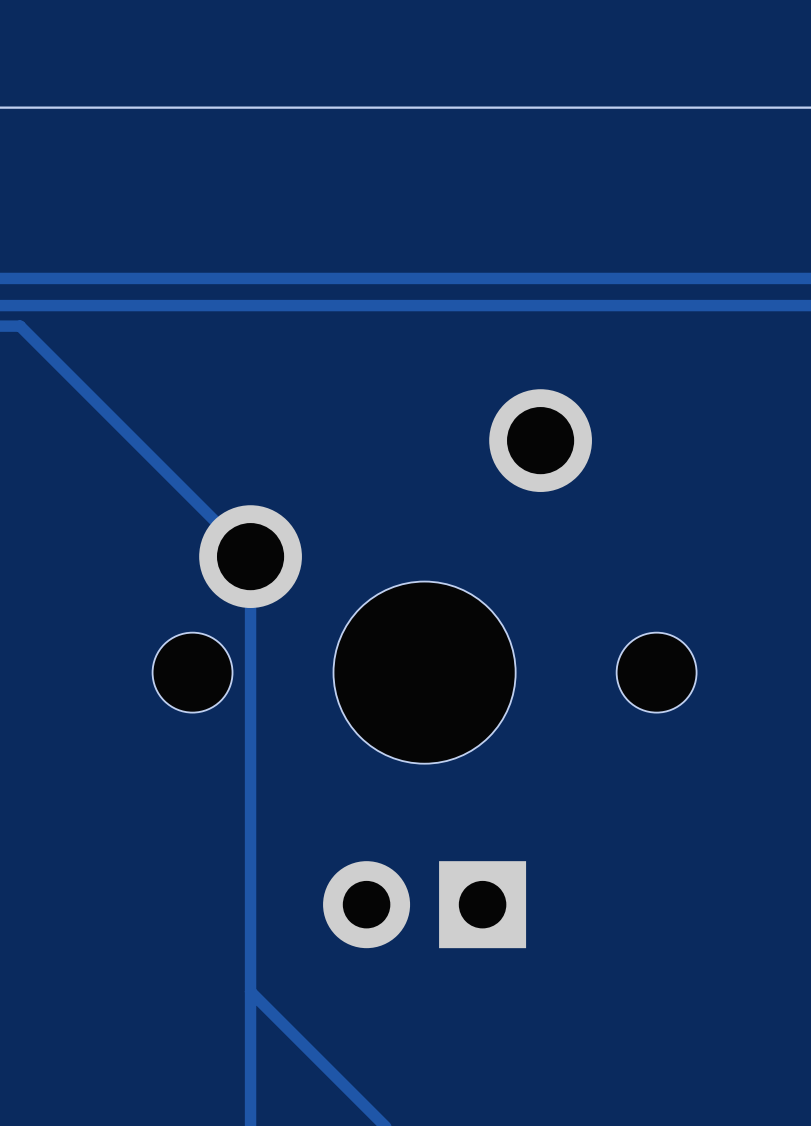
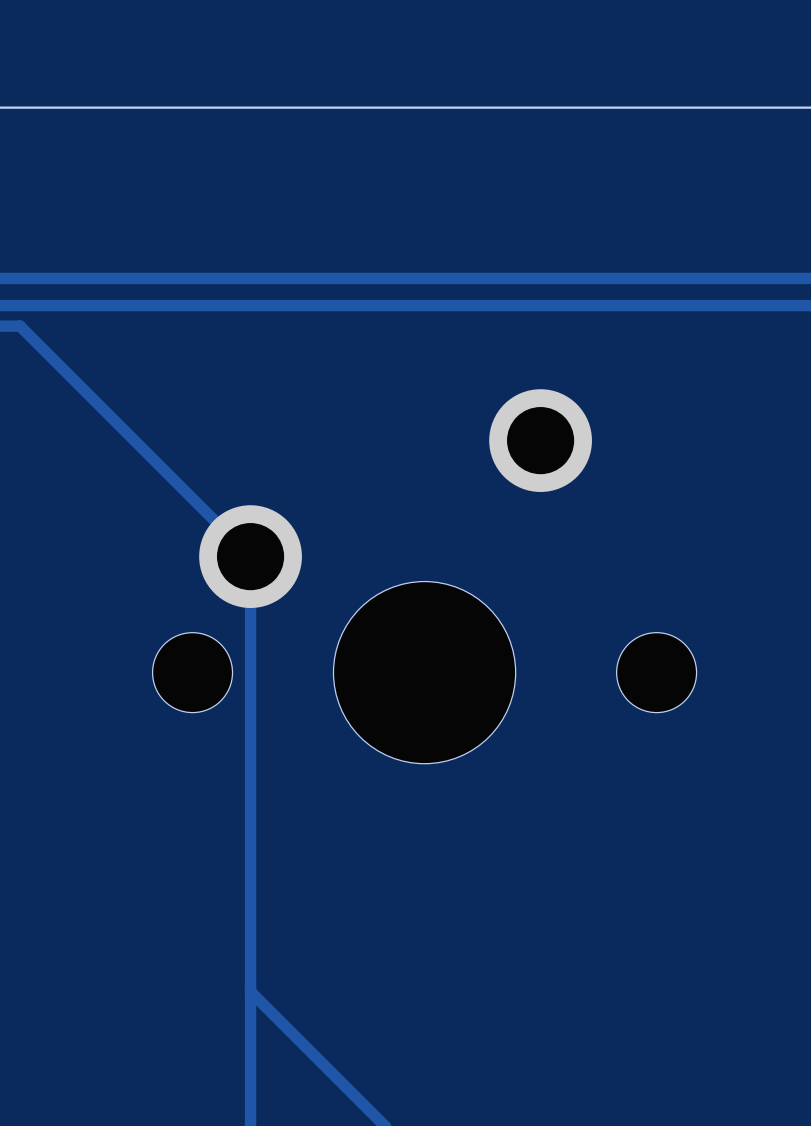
part: (424, 668) -> none

